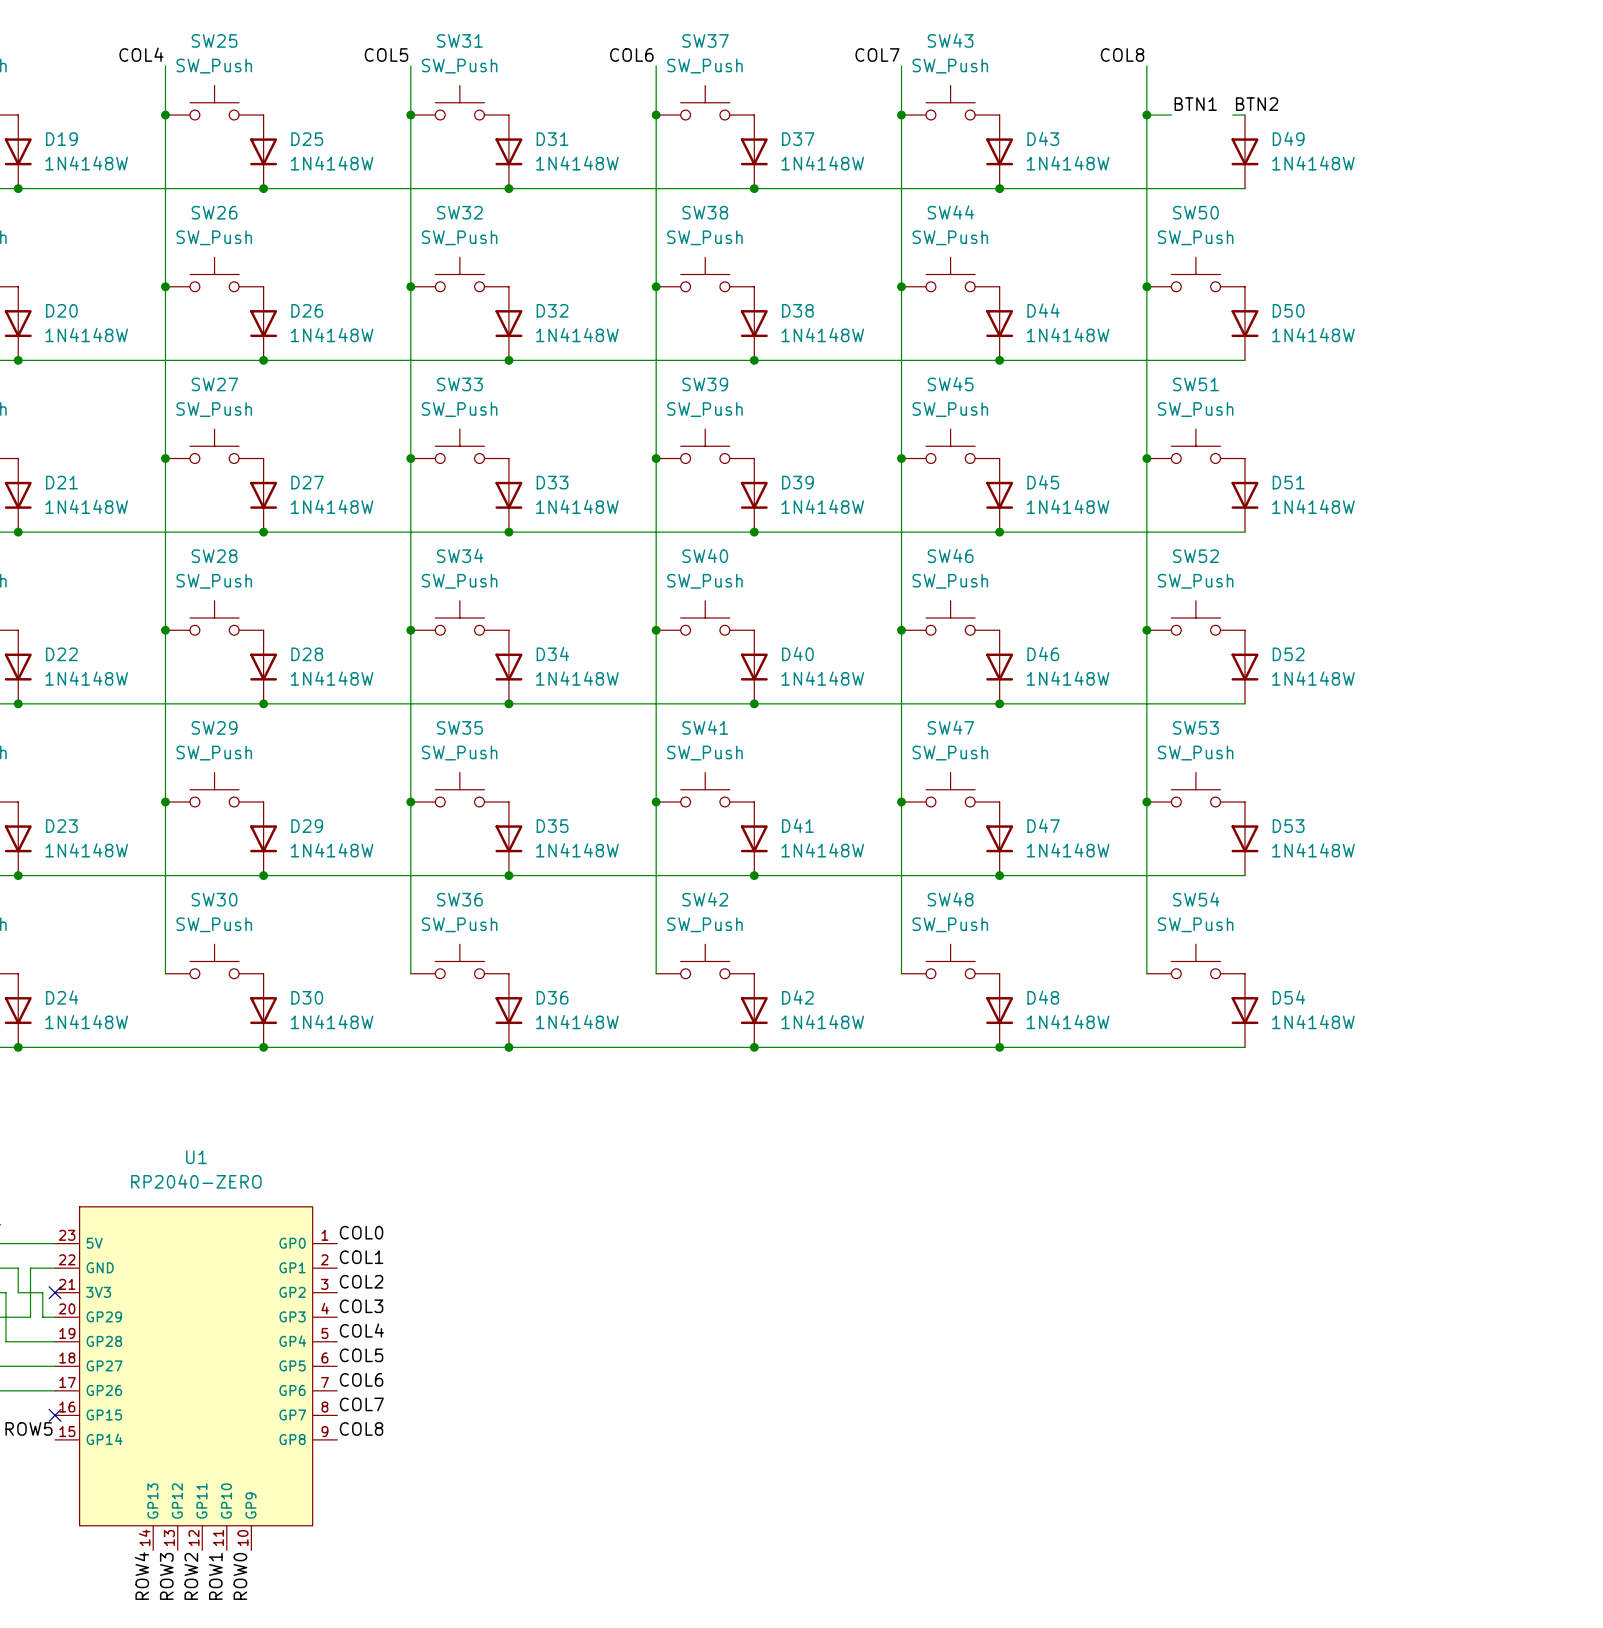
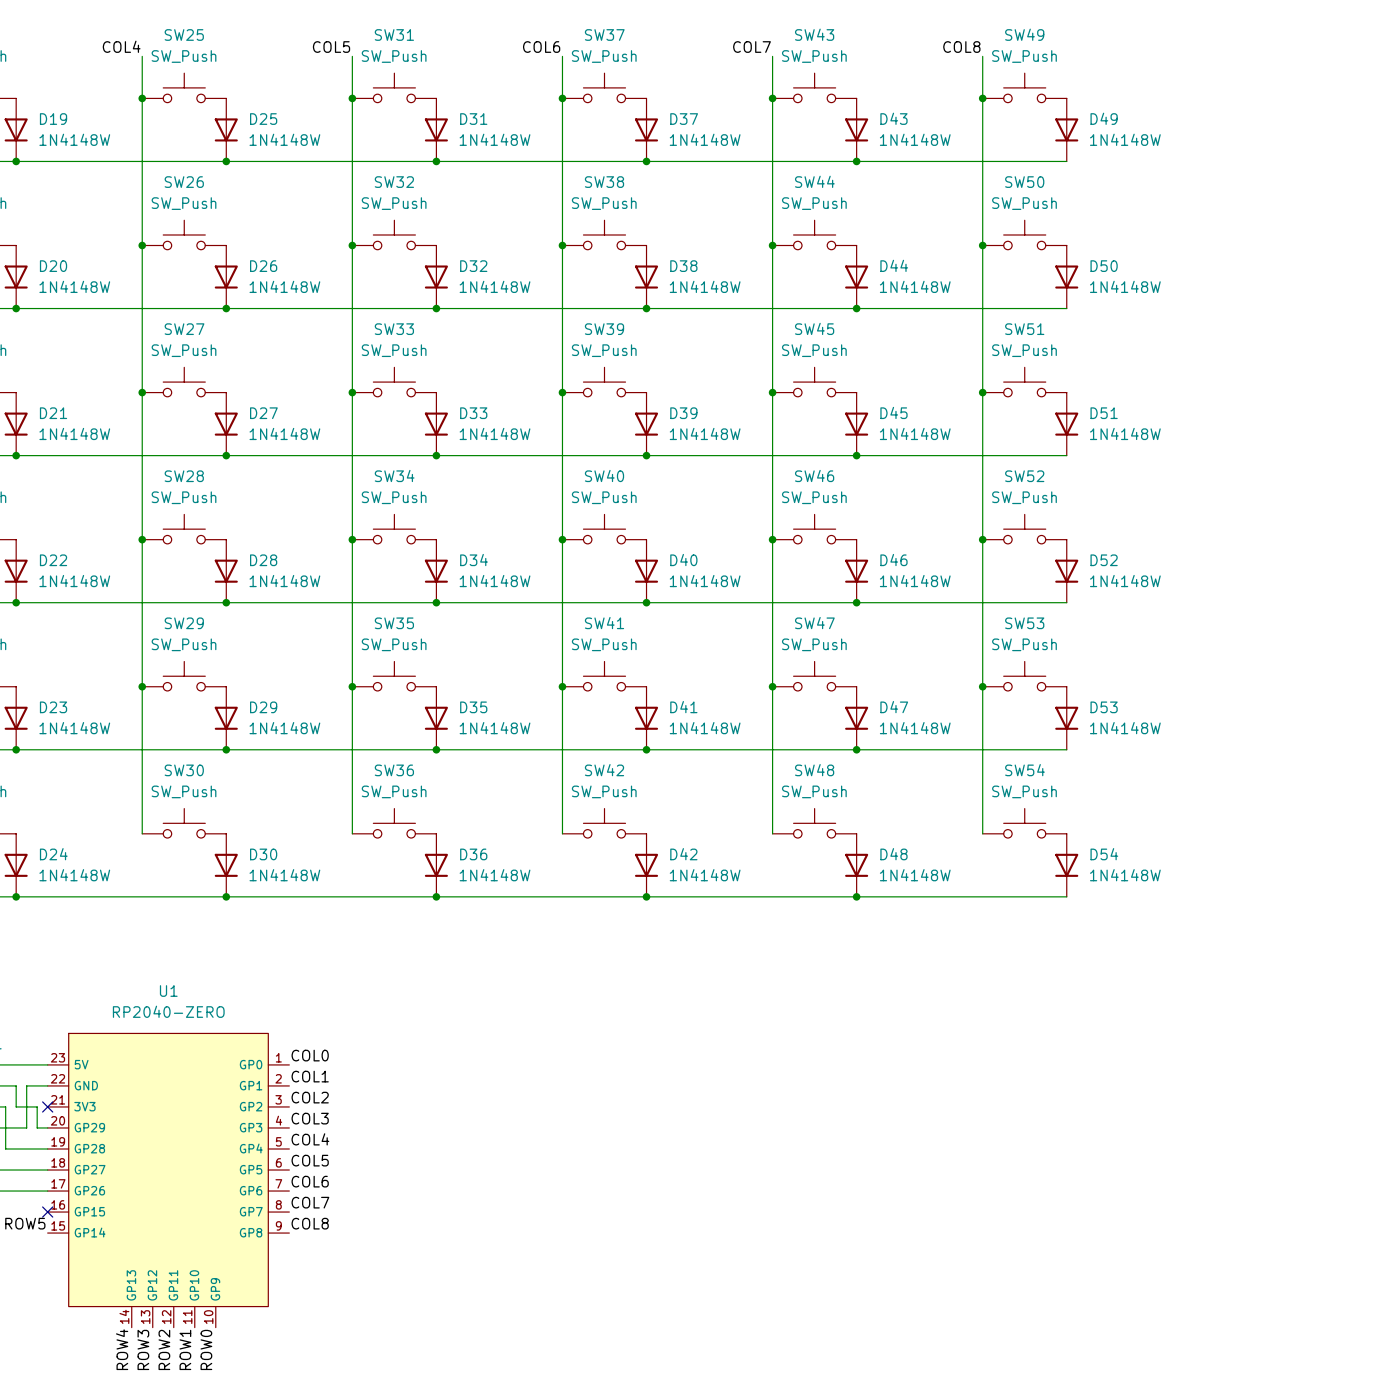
SW49: none -> SW_Push (1024, 87)
label: BTN1 (1195, 104) -> none
label: BTN2 (1257, 104) -> none

